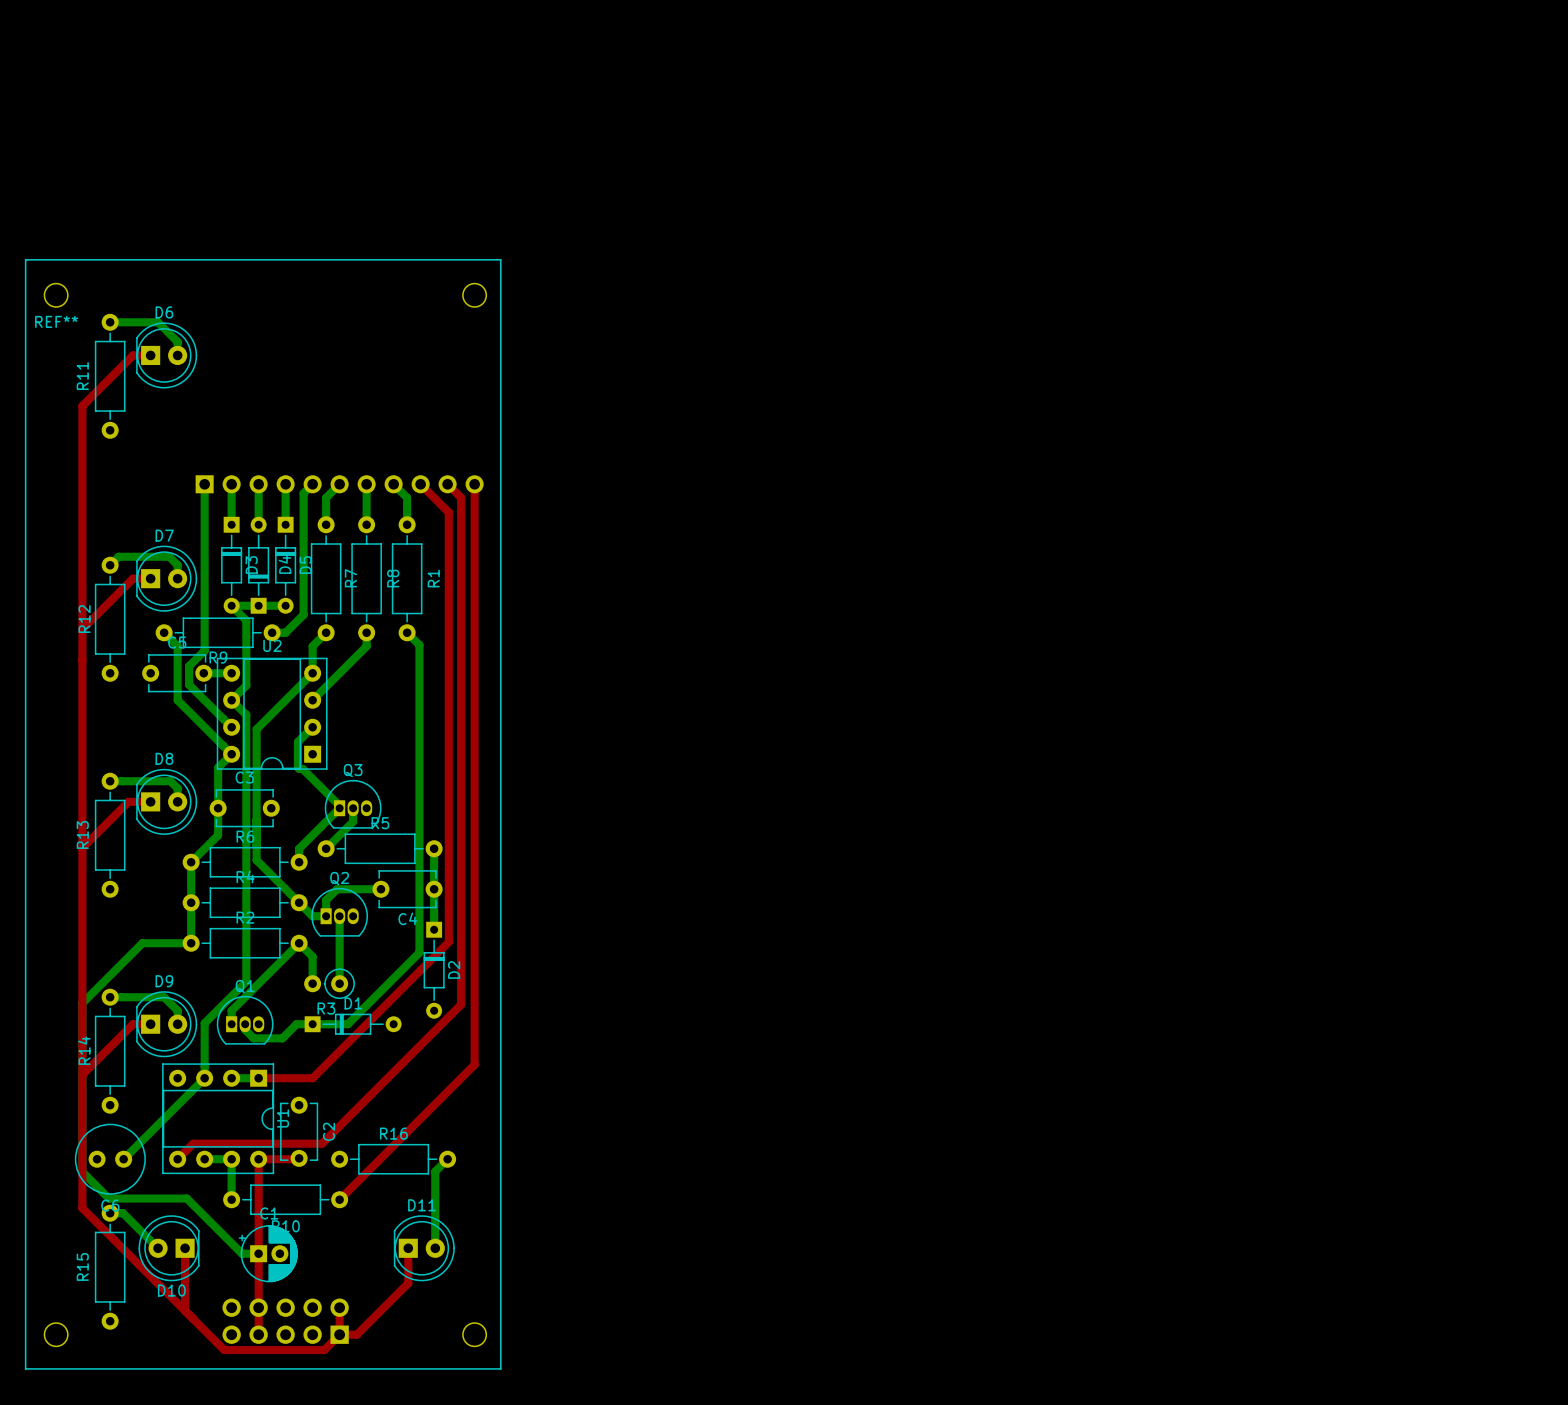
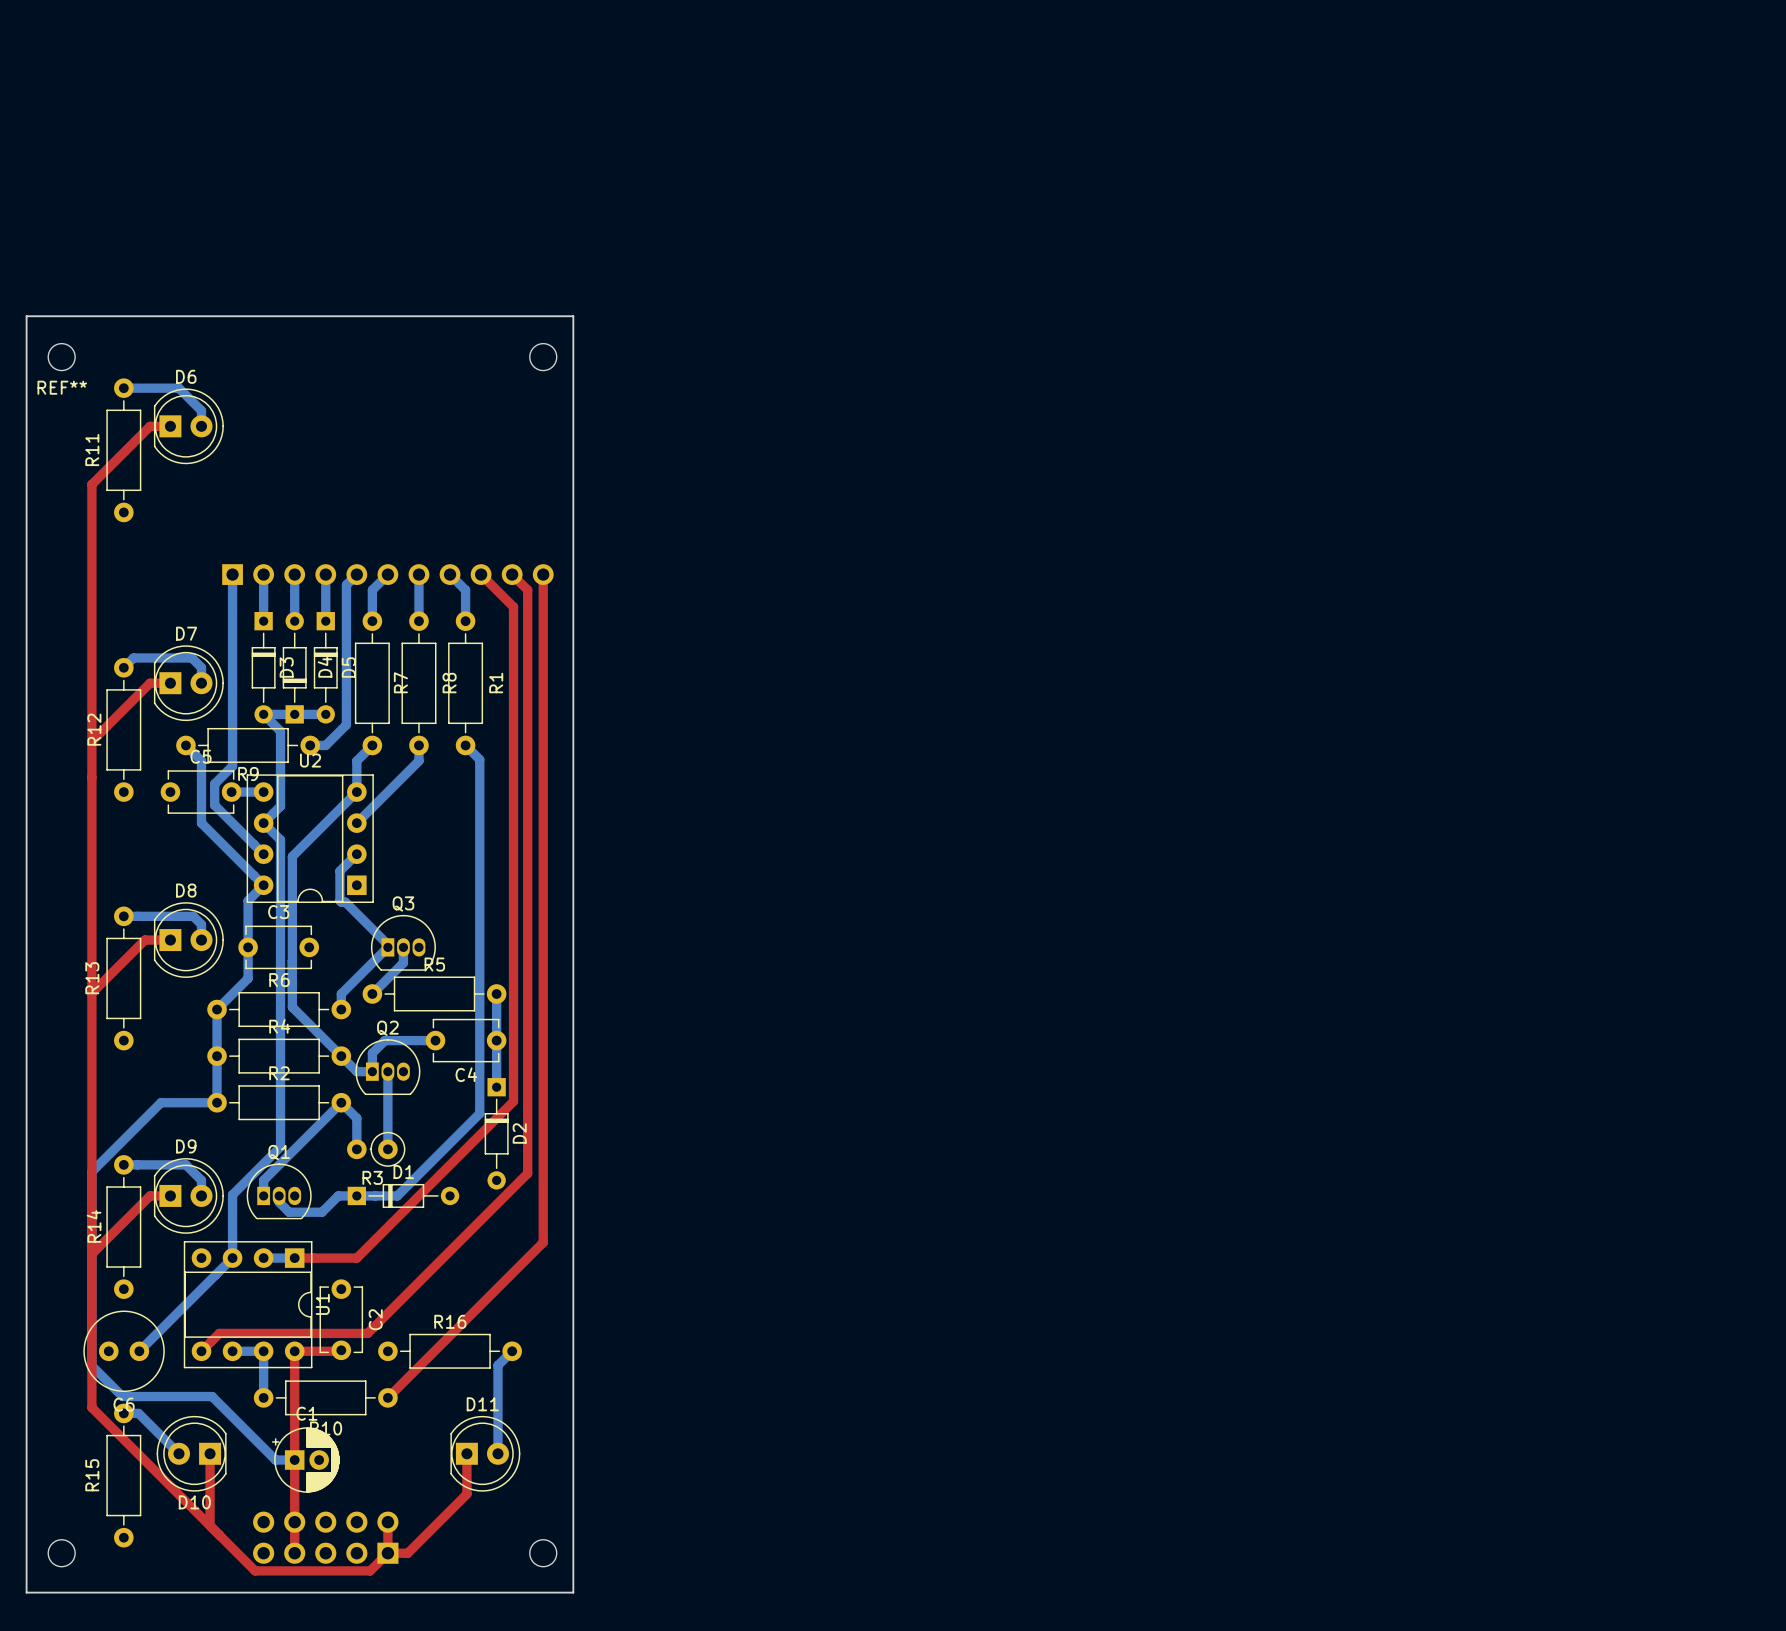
line: (25, 259) (25, 1368) (500, 1368) (500, 259) (25, 259) -> none
board edge: none -> (26, 316) (26, 1592) (573, 1592) (573, 316) (26, 316)

